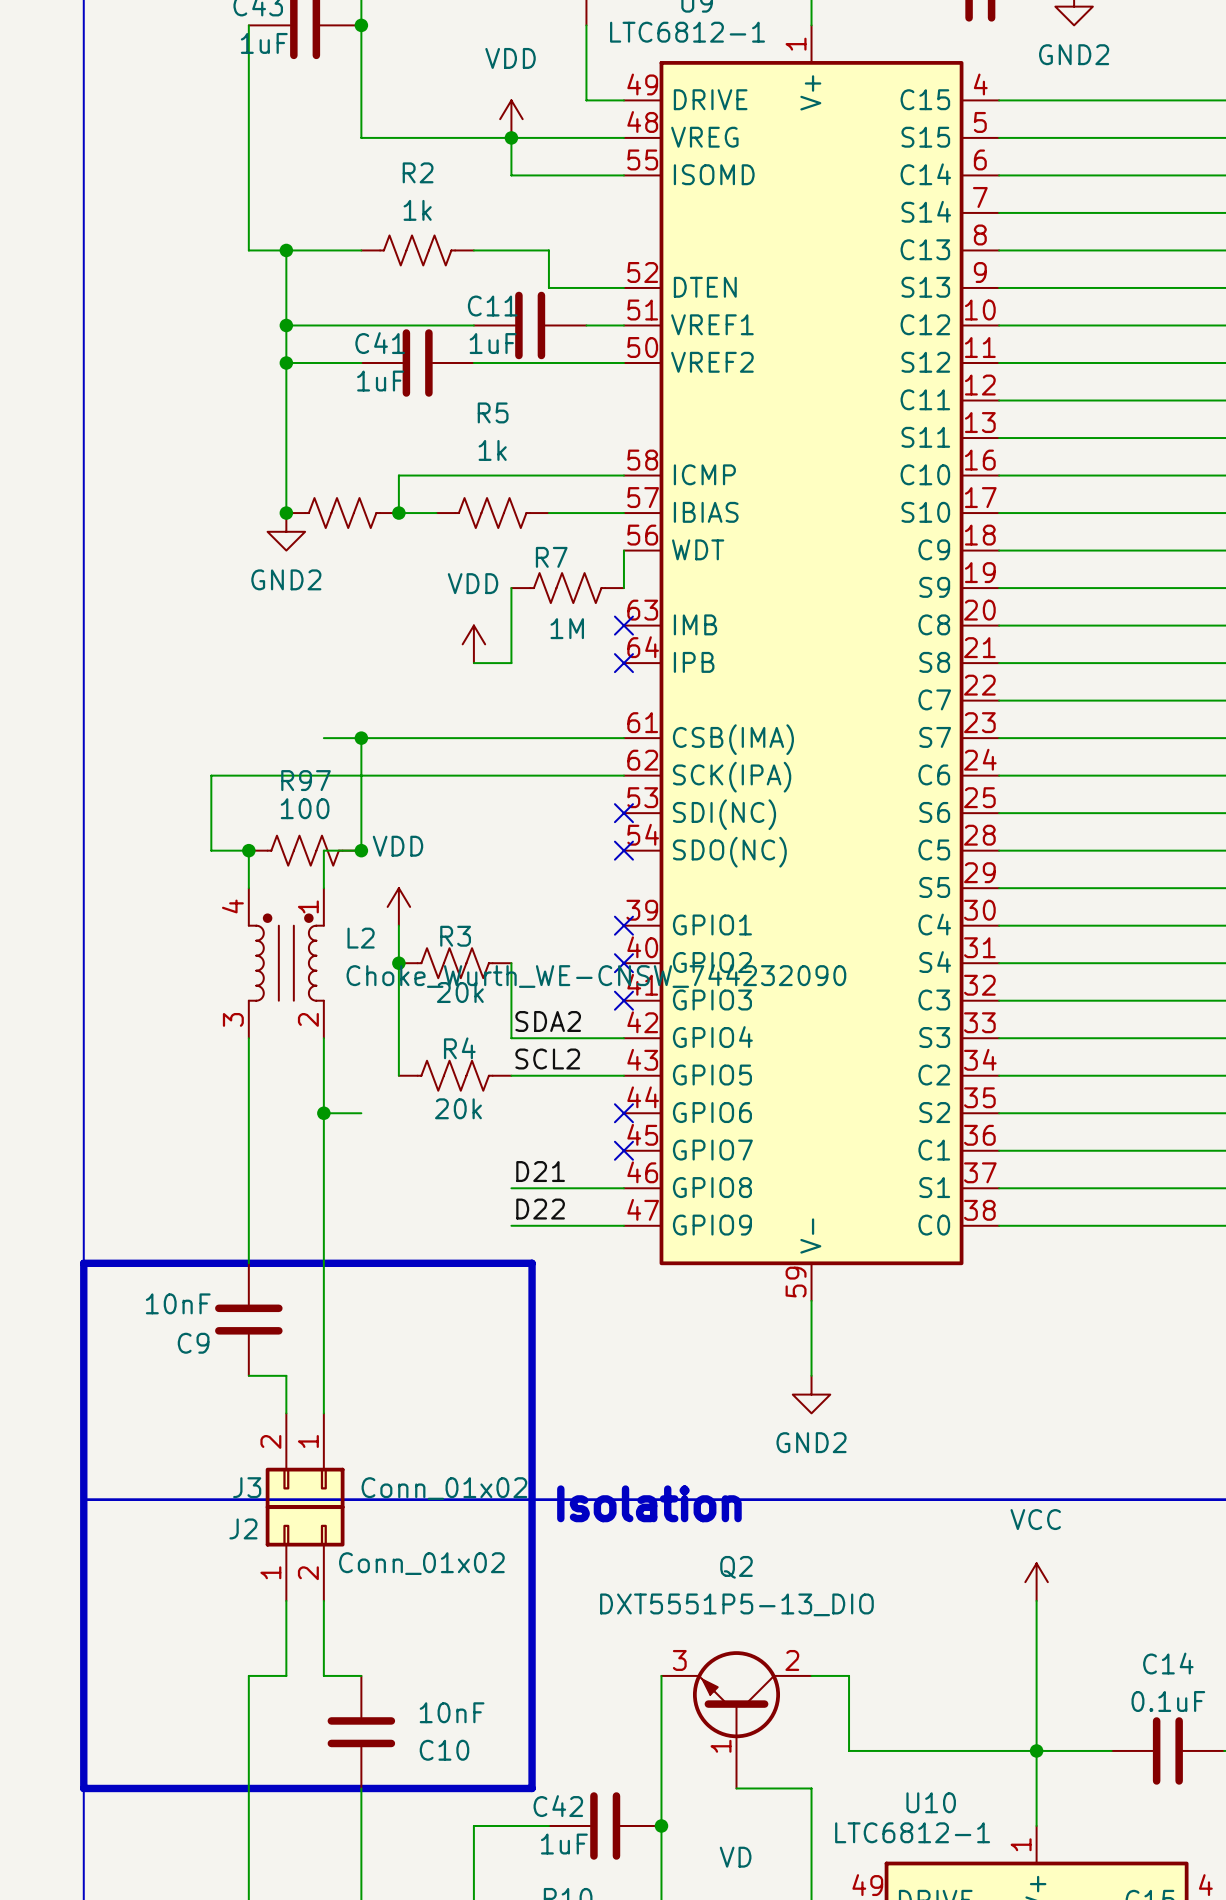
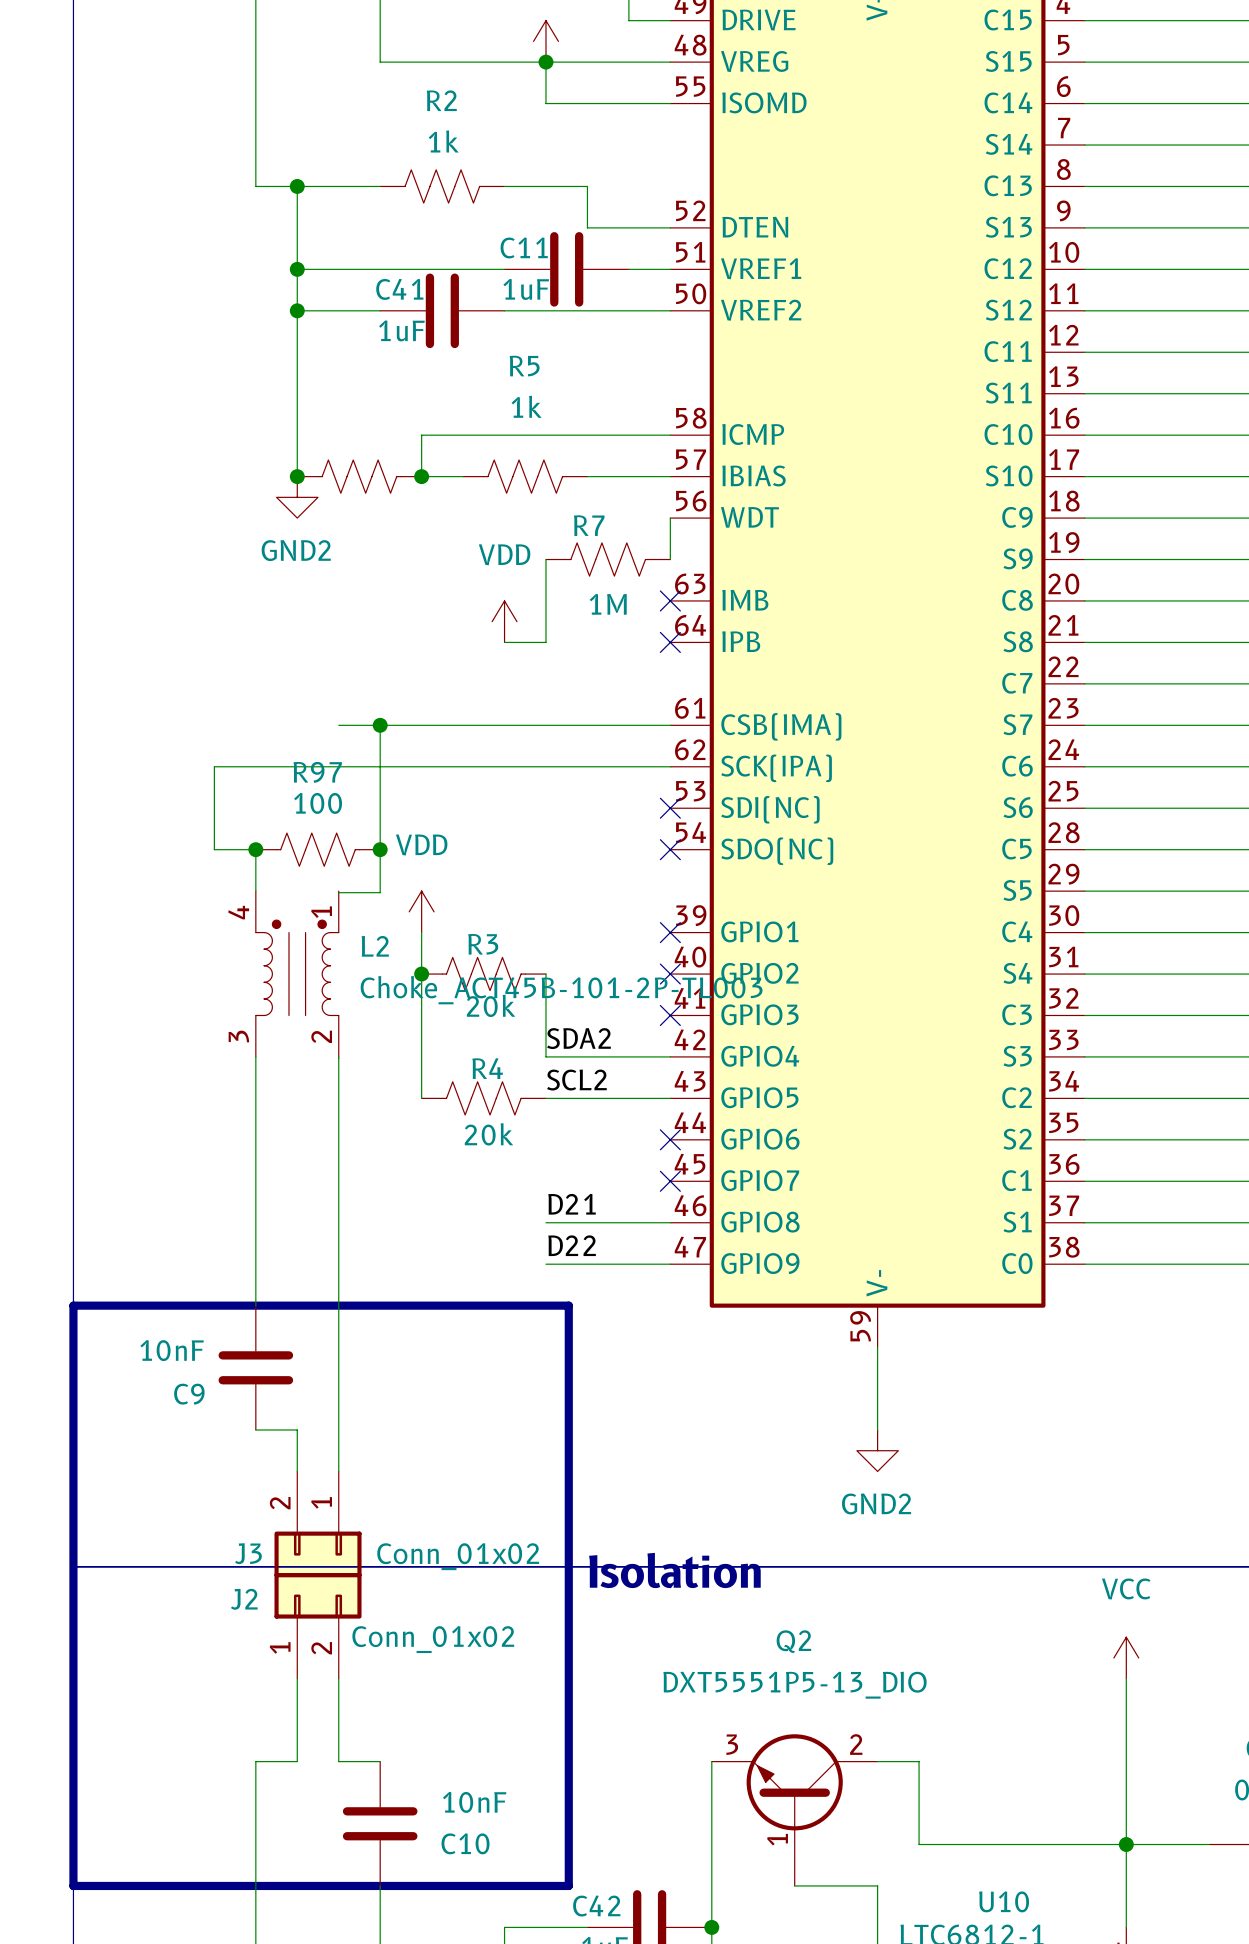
wire: (361, 850) (323, 850) (323, 888) -> (380, 849) (380, 892) (338, 892)
L2 value: Choke_Wurth_WE-CNSW_744232090 (596, 976) -> Choke_ACT45B-101-2P-TL003 (561, 990)
wire: (323, 1113) (361, 1113) -> none
junction: (323, 1113) -> none

